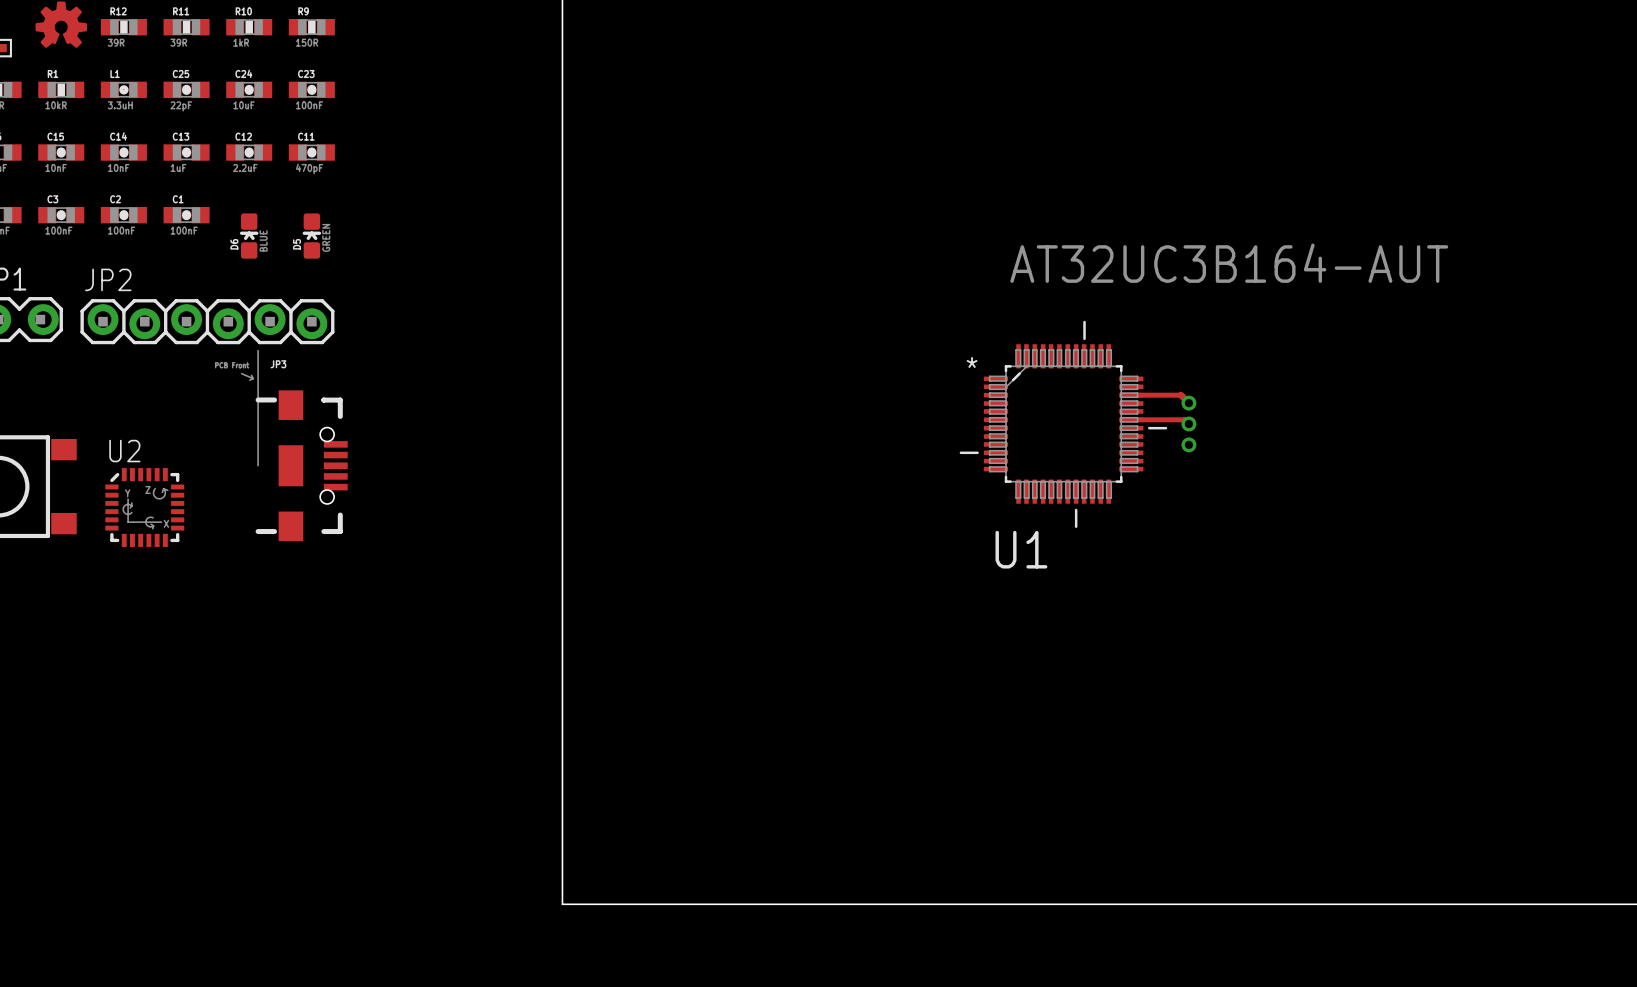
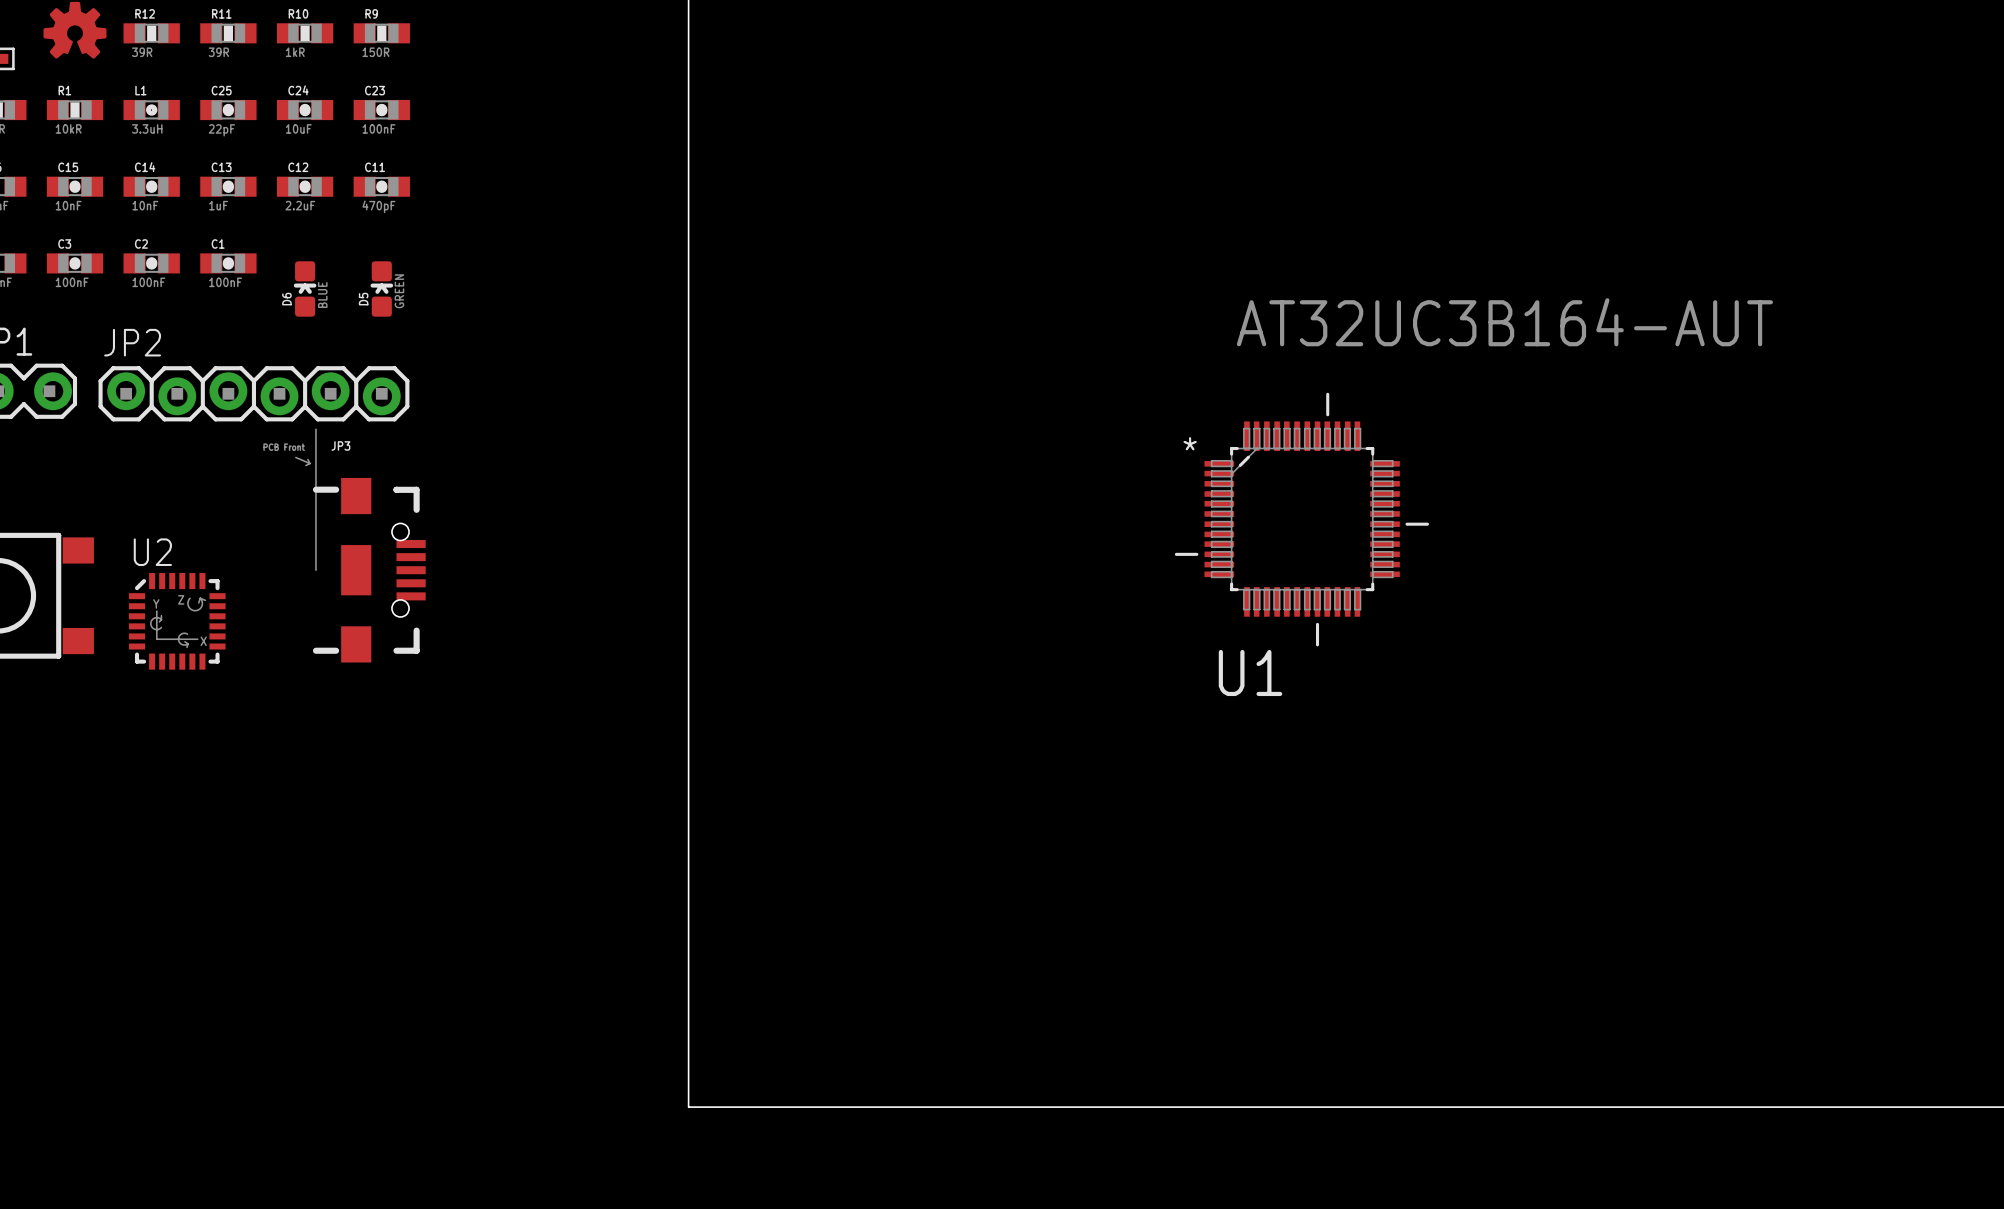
top track: (1131, 395) (1180, 395) (1188, 403) -> none
via: (1188, 403) -> none
top track: (1131, 419) (1184, 419) (1188, 423) -> none
via: (1188, 423) -> none
via: (1188, 444) -> none

